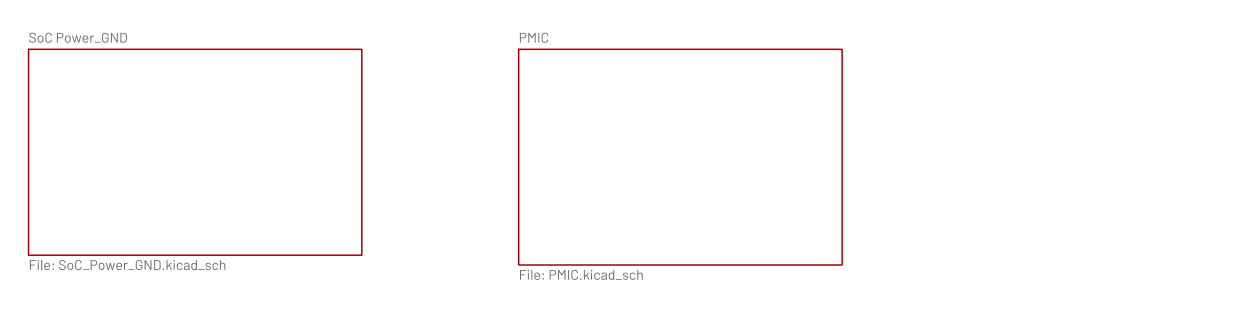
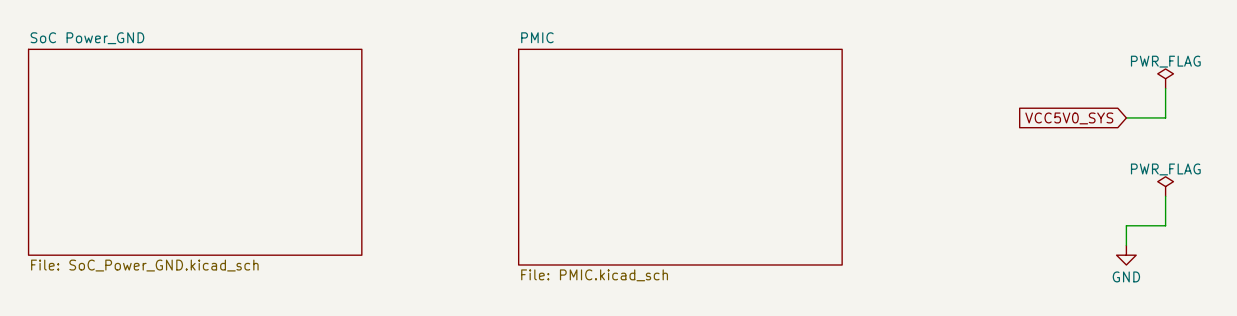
power symbol: none -> PWR_FLAG (1165, 78)
wire: none -> (1165, 88) (1165, 117) (1126, 117)
global label: none -> VCC5V0_SYS (1069, 118)
power symbol: none -> PWR_FLAG (1165, 186)
wire: none -> (1165, 196) (1165, 225) (1126, 225) (1126, 245)
power symbol: none -> GND (1126, 255)

